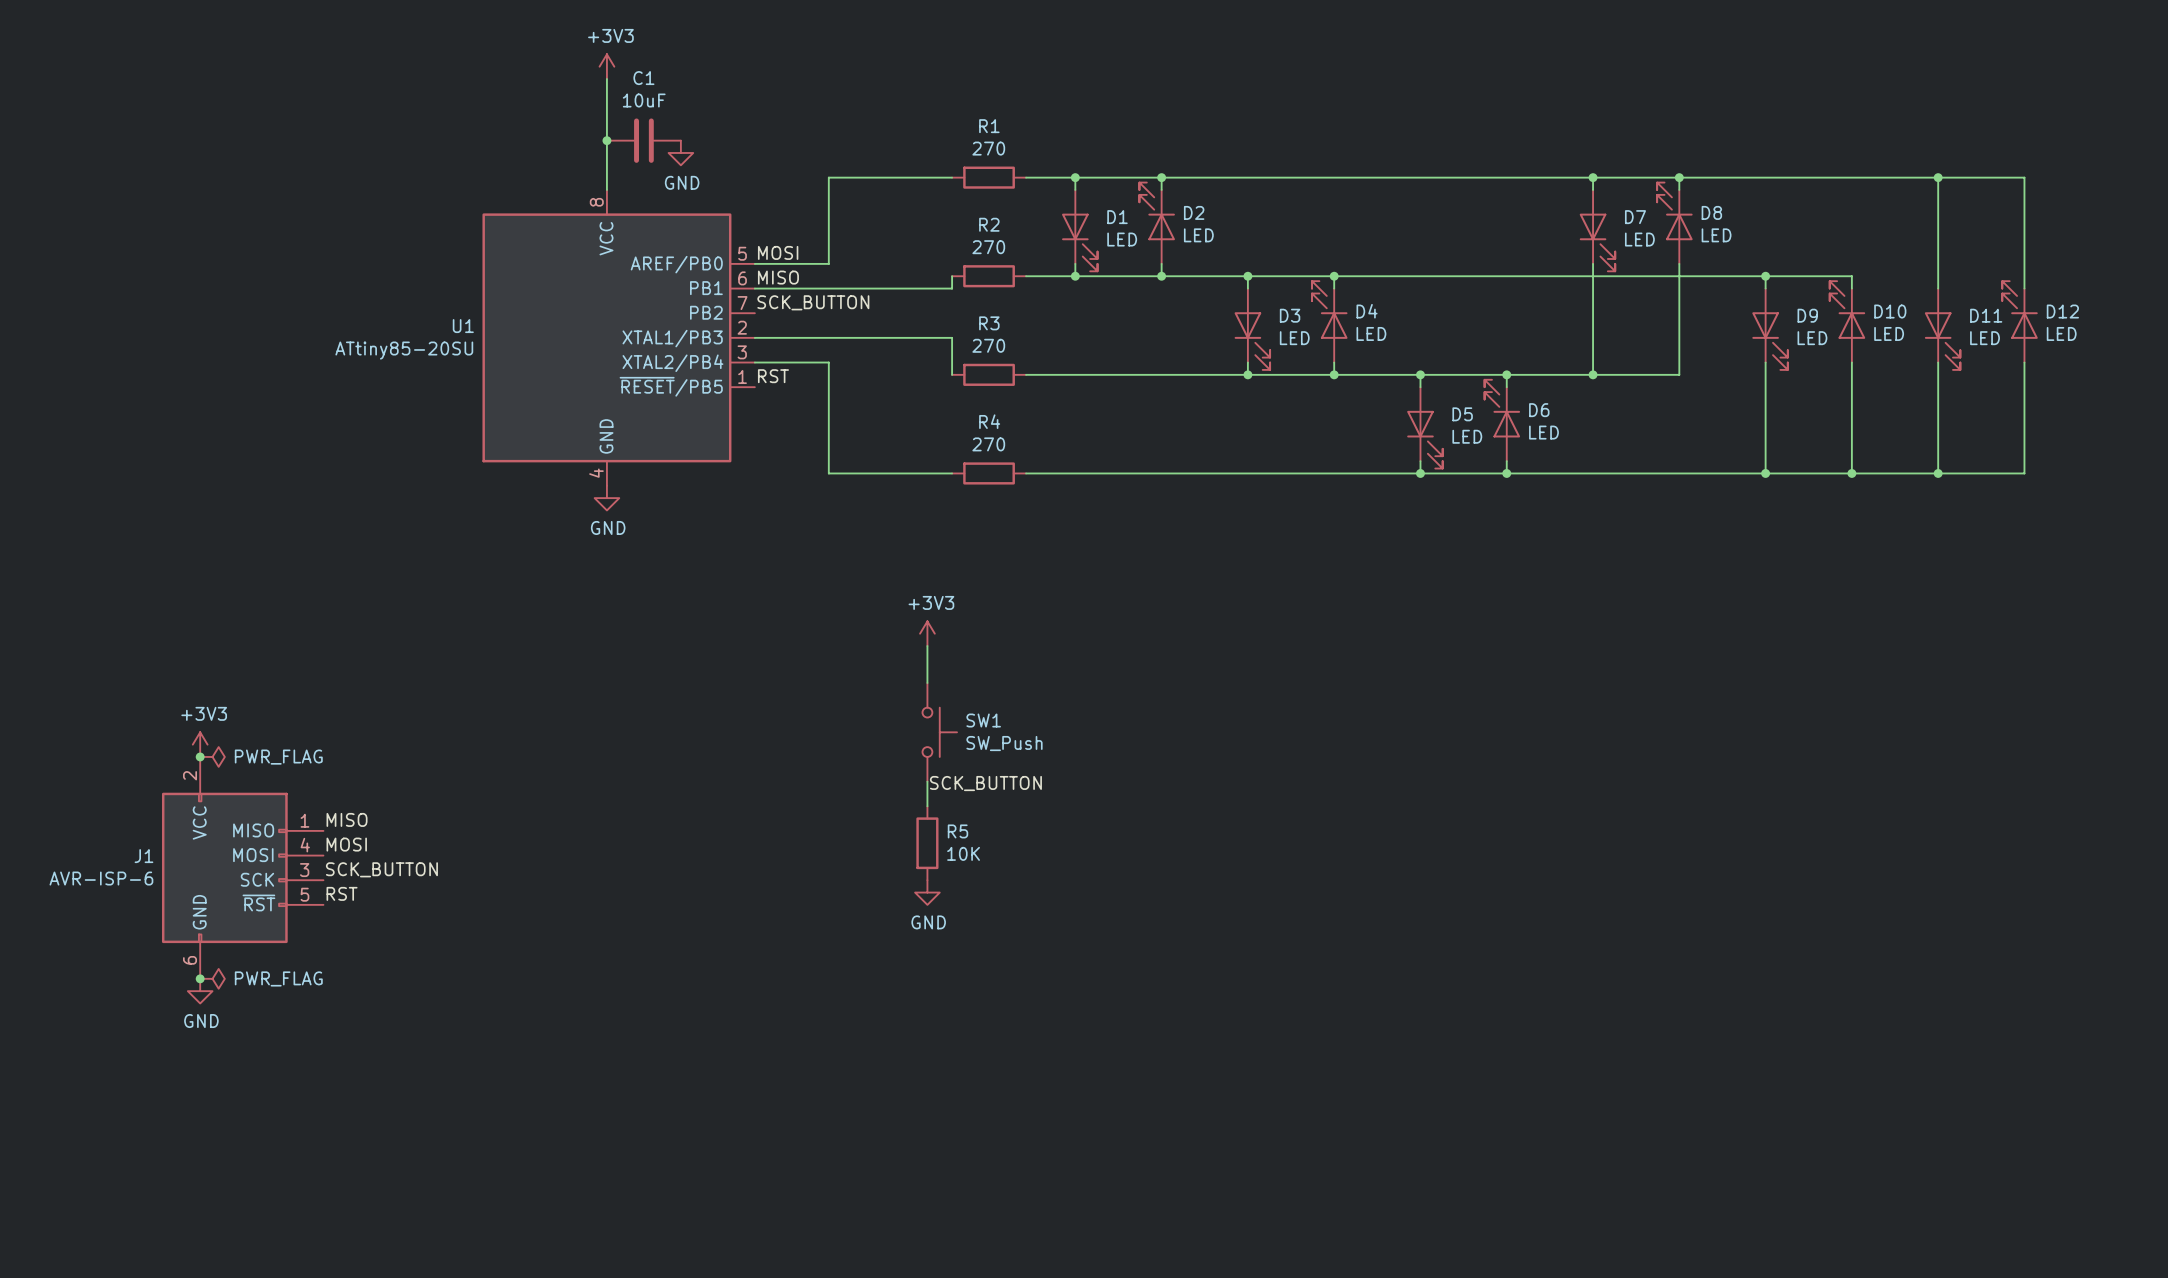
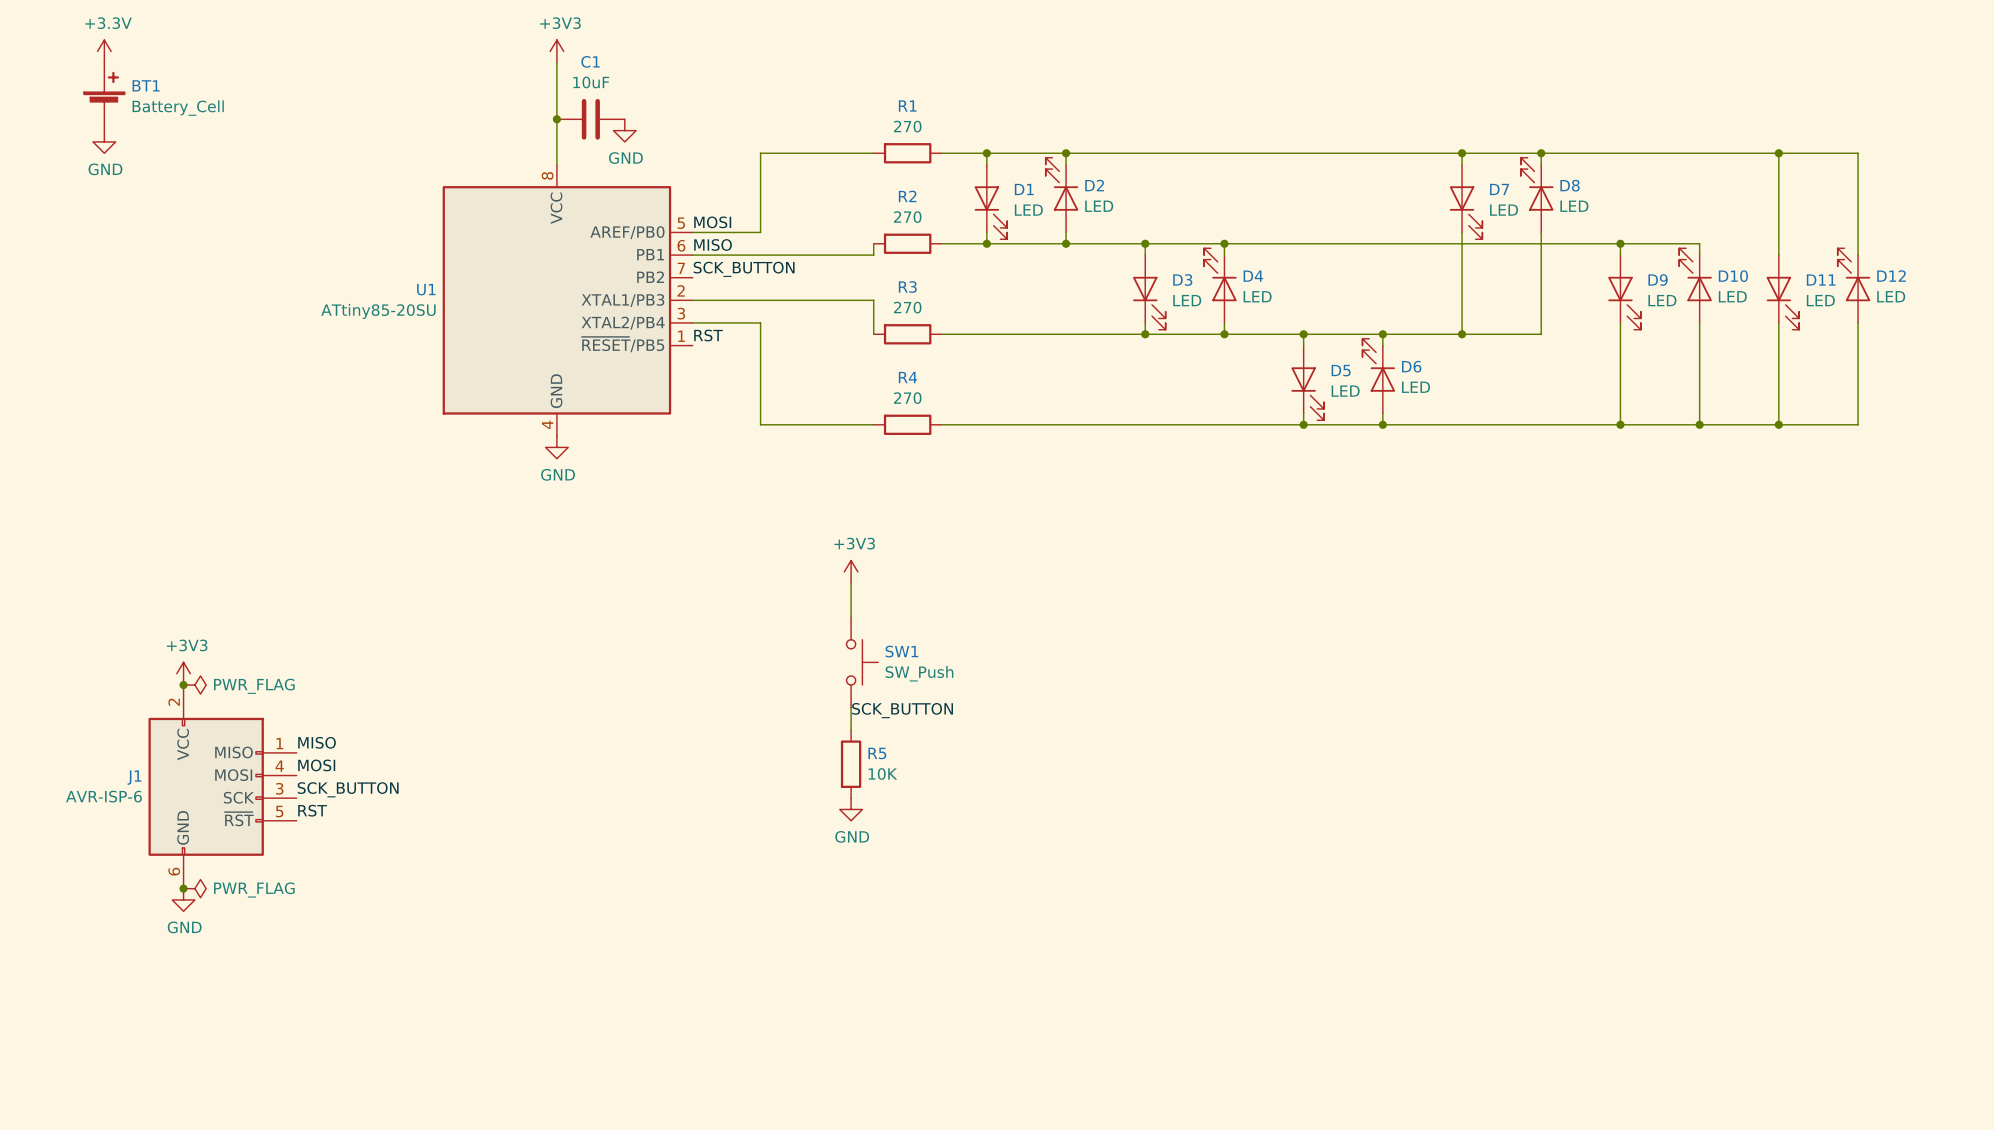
power symbol: none -> +3.3V (104, 51)
BT1: none -> Battery_Cell (104, 96)
power symbol: none -> GND (104, 141)

